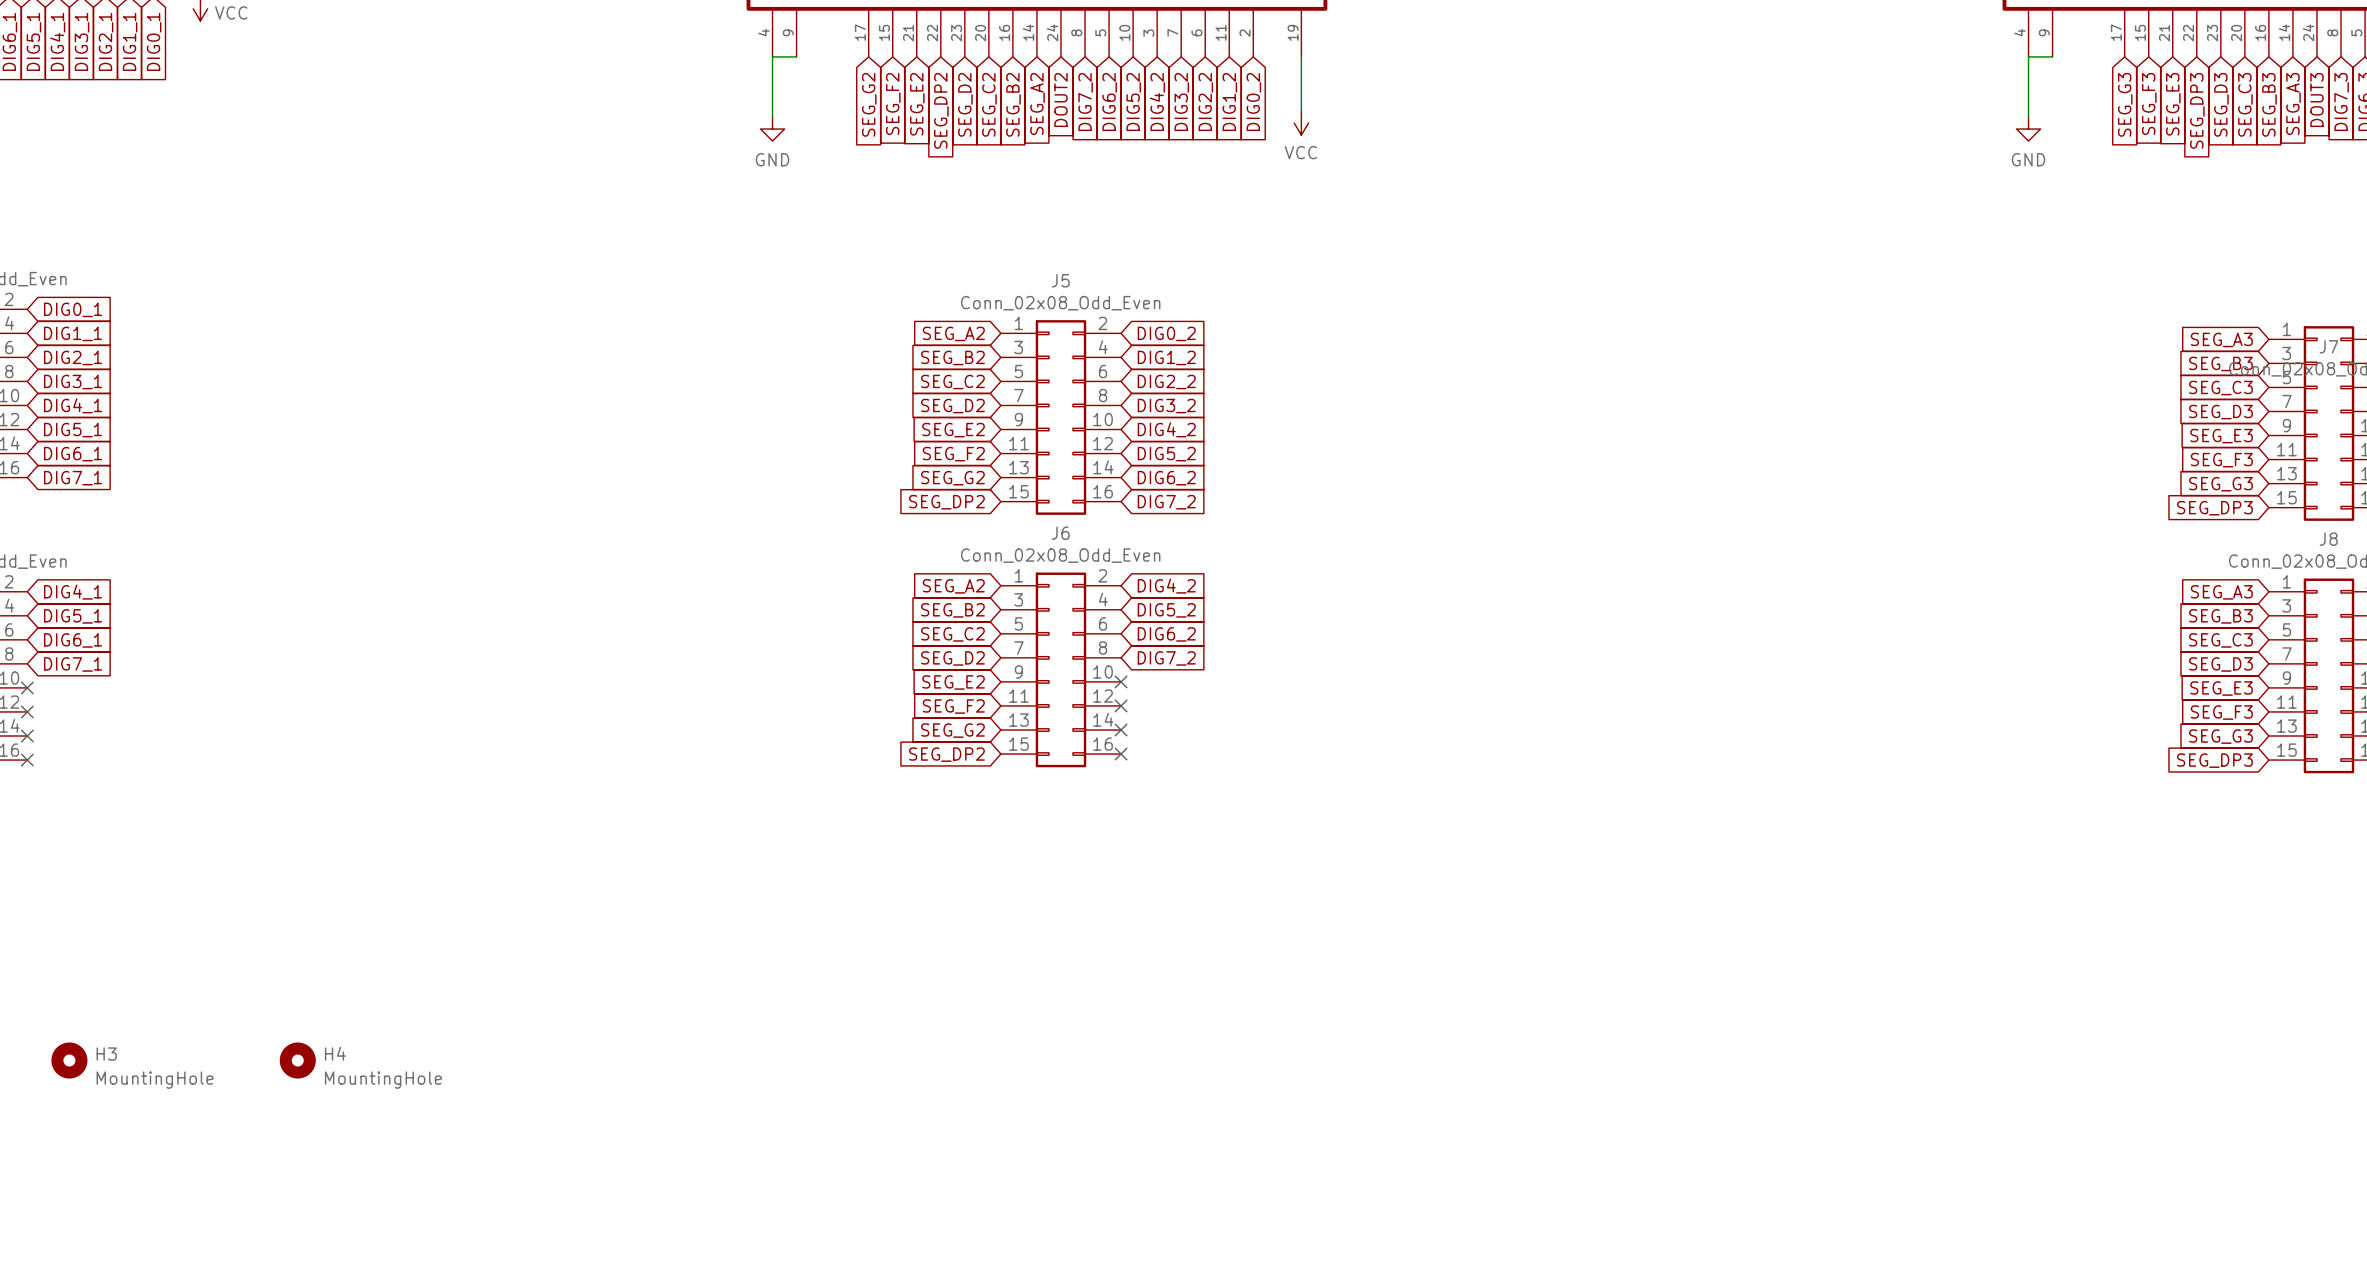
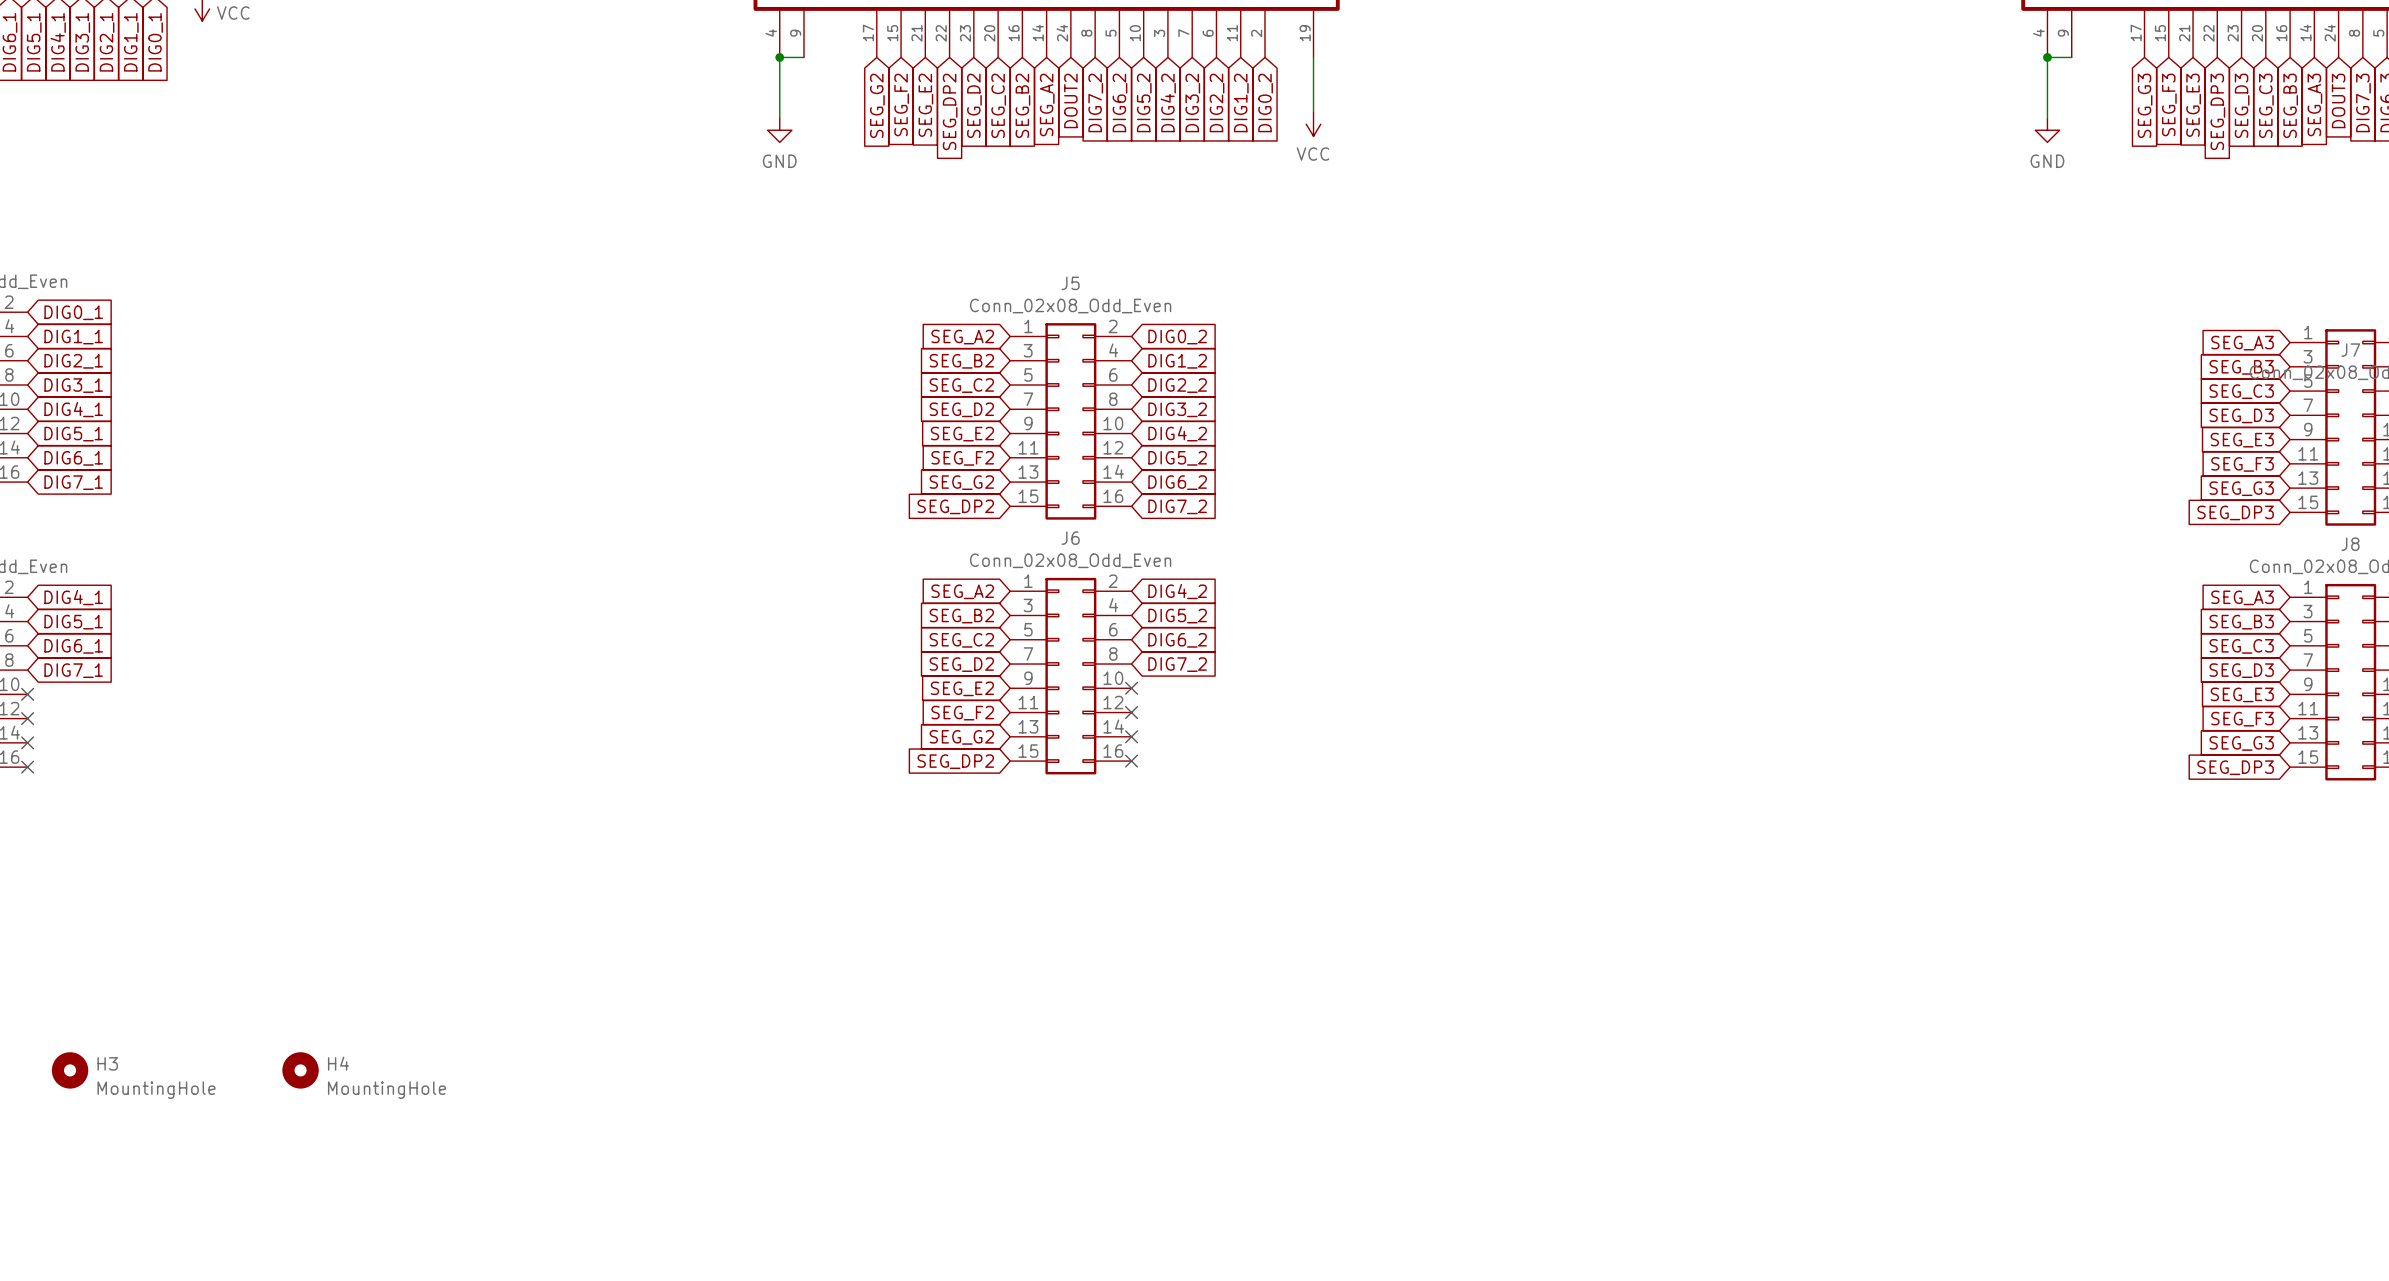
junction: none -> (779, 57)
junction: none -> (2047, 57)

